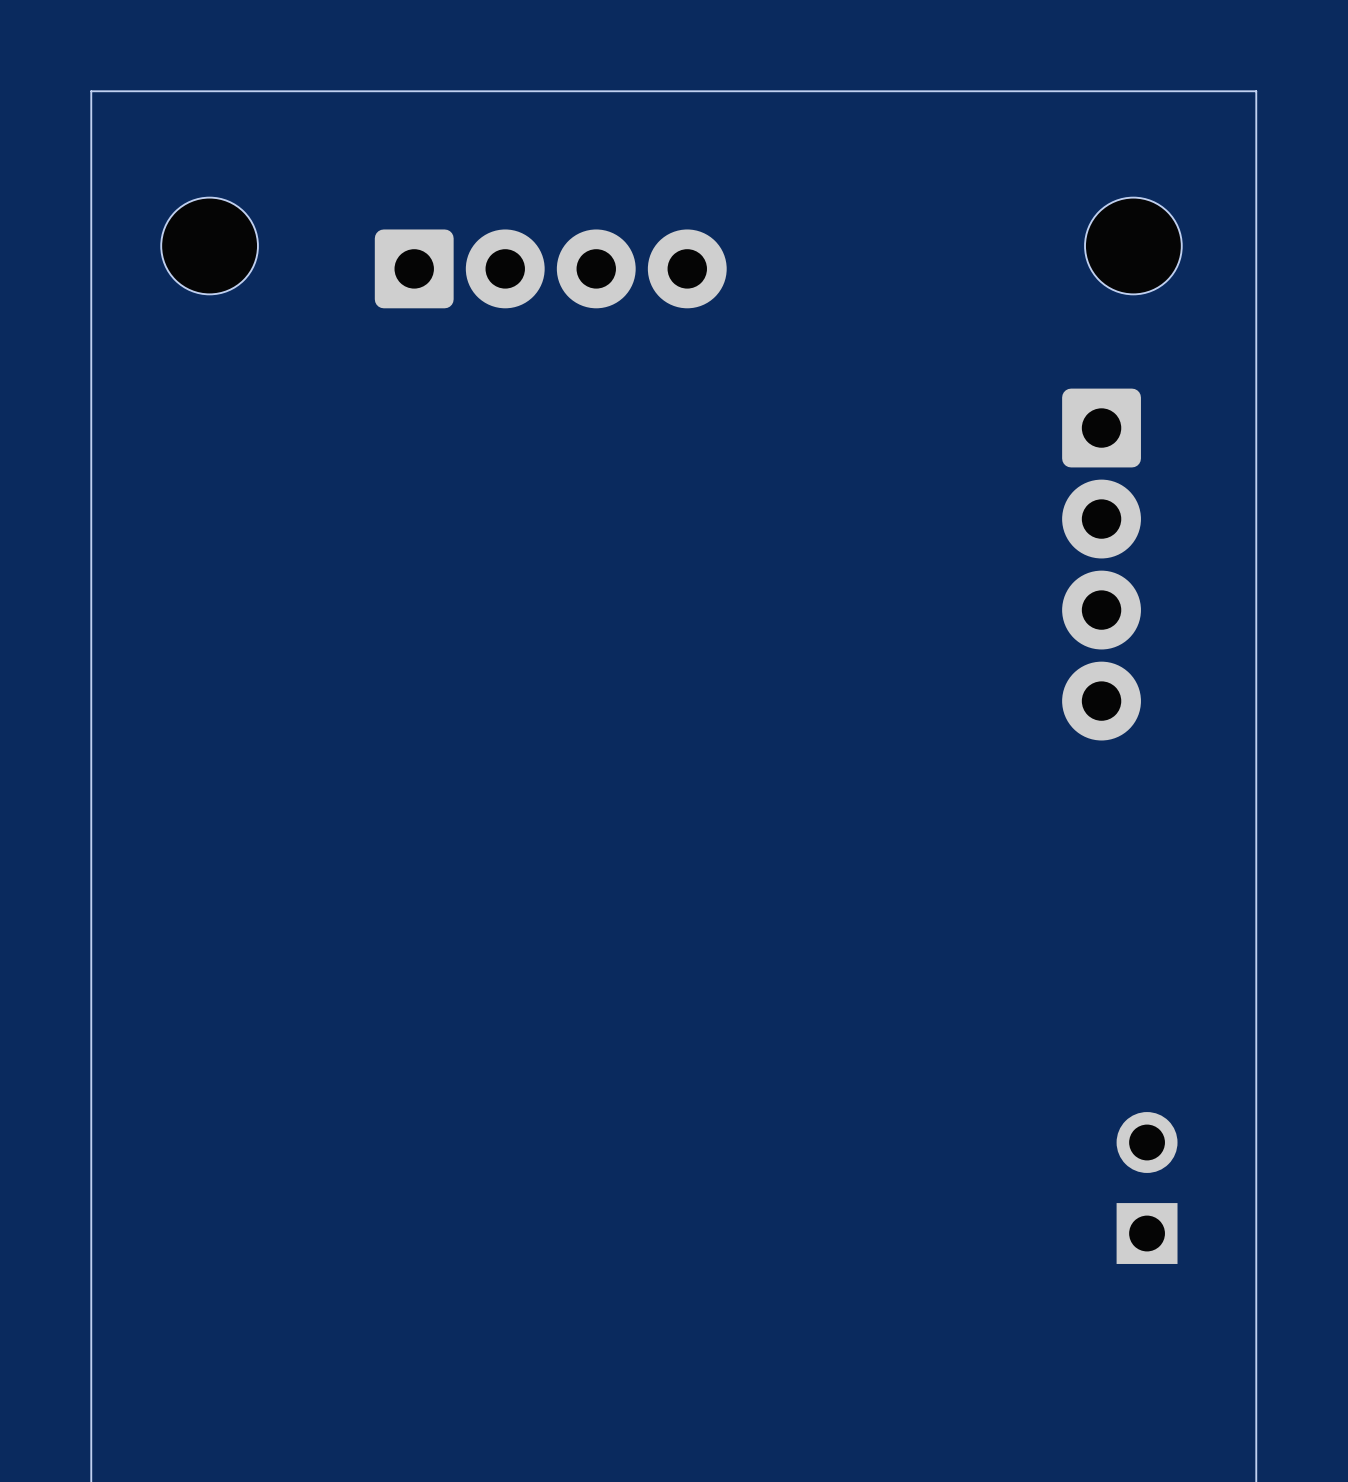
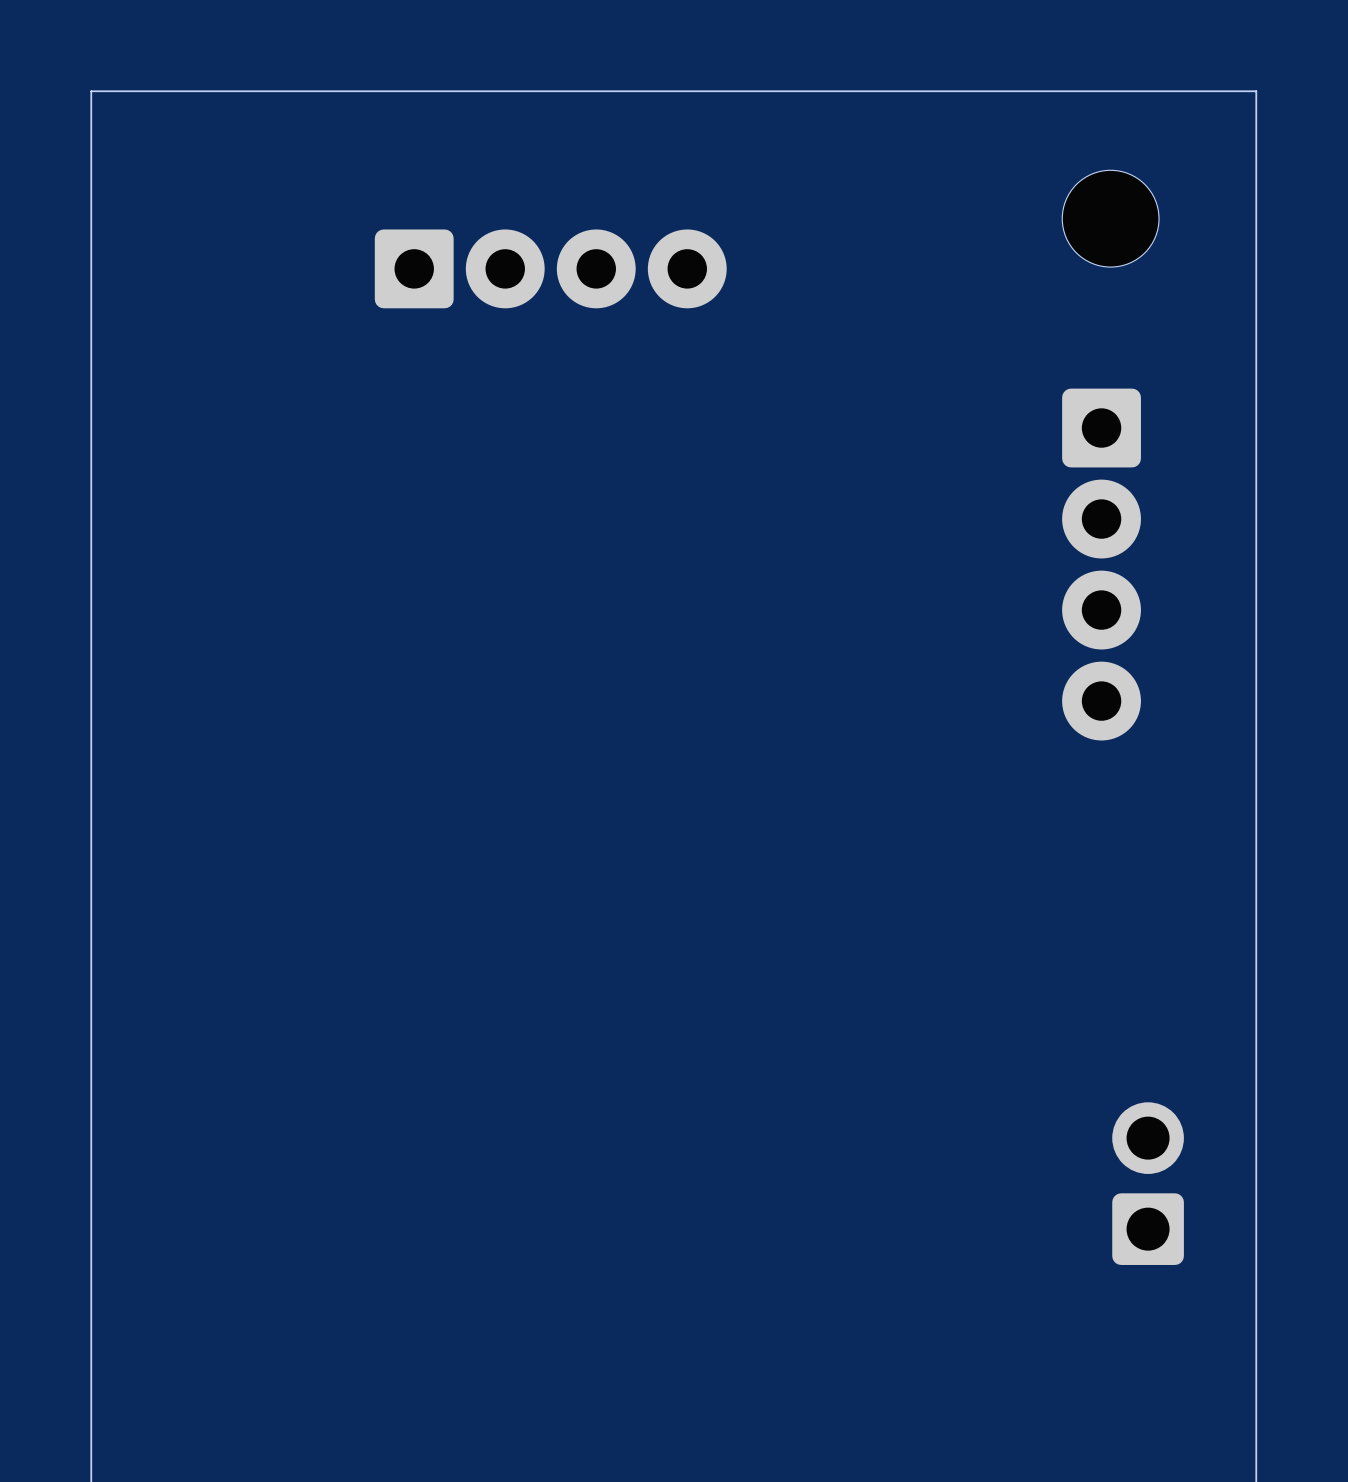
part: (209, 245) -> none
part position: (1133, 245) -> (1110, 218)
part footprint: [1116, 1112, 1178, 1264] -> [1112, 1102, 1184, 1265]

